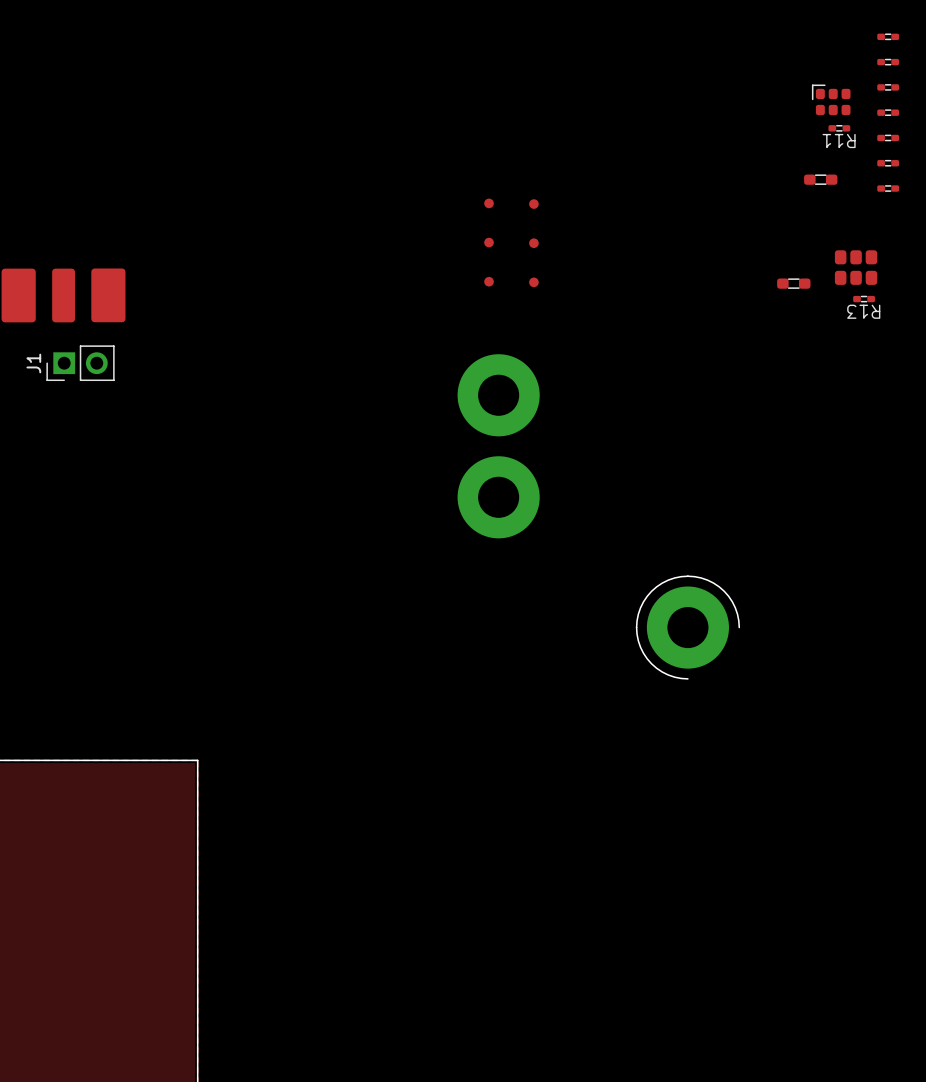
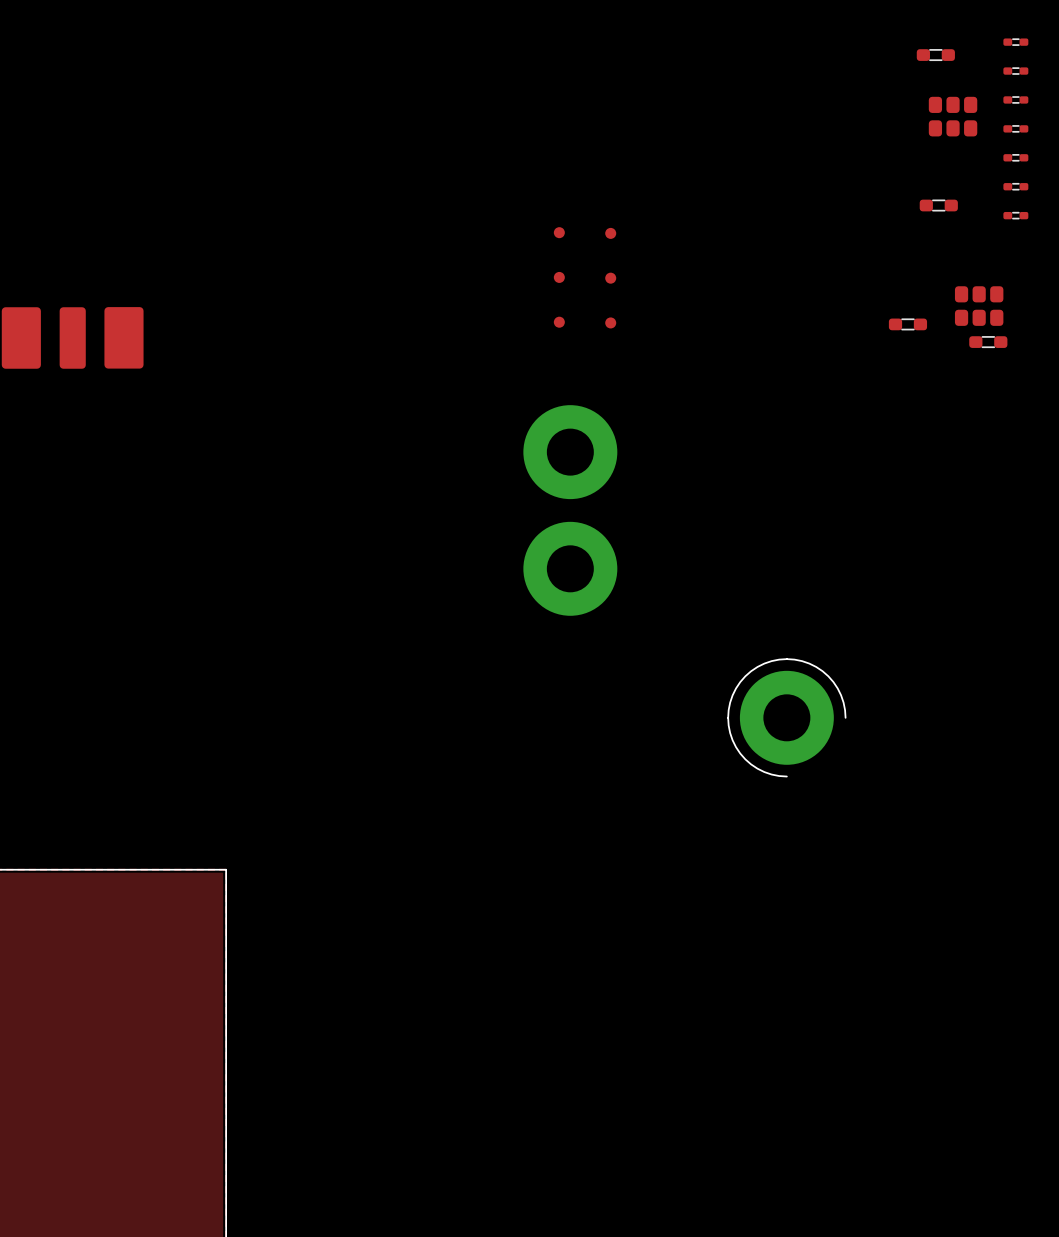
part: none -> (935, 55)
part footprint: [811, 84, 851, 116] -> [928, 96, 978, 137]
R11: (839, 128) -> none
R13: (864, 299) -> none
part: none -> (988, 342)
J1: (80, 363) -> none

